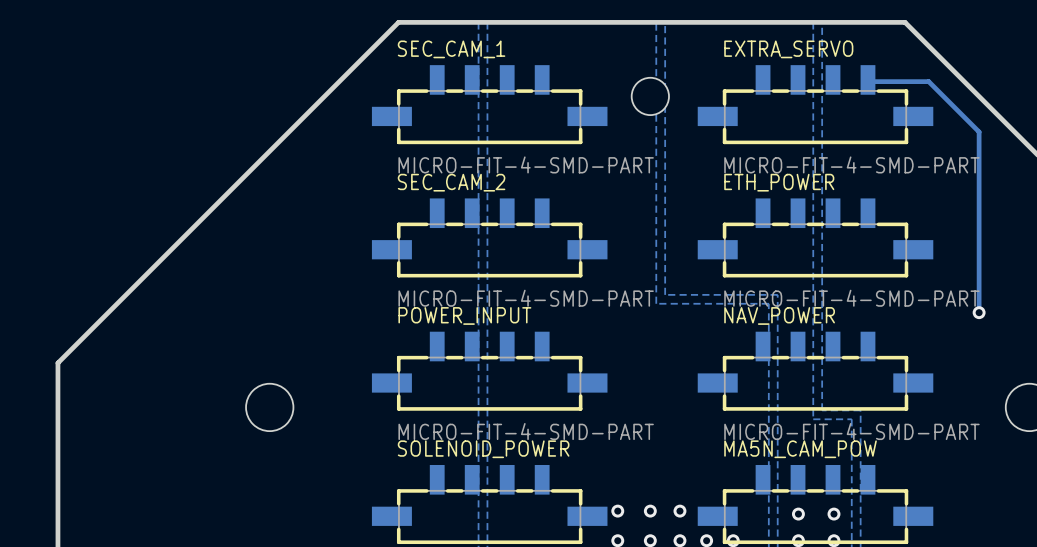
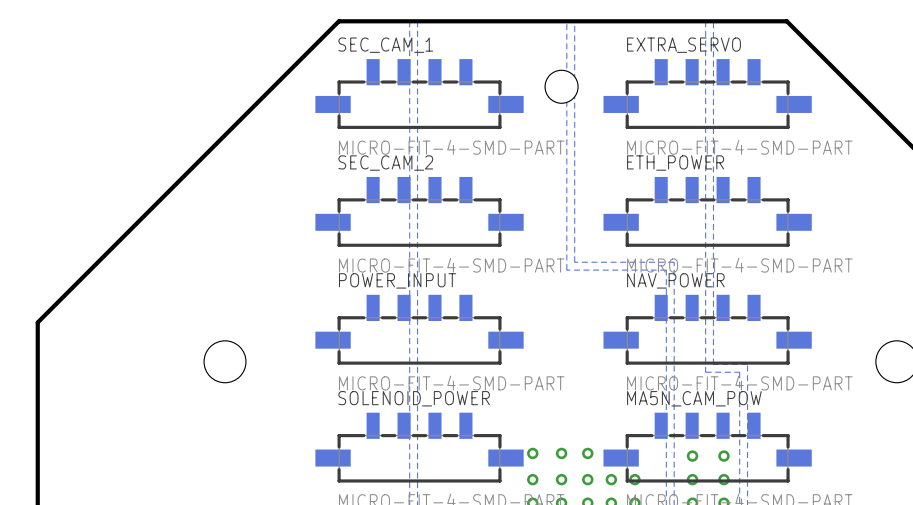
track: (867, 79) (869, 81) (928, 81) (979, 131) (979, 312) -> none
via: (979, 312) -> none

